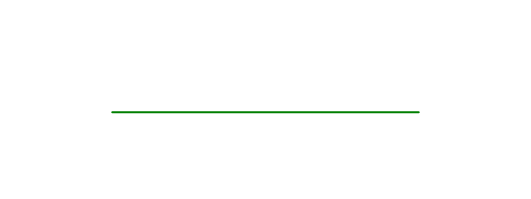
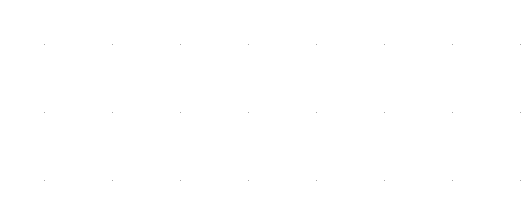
wire: (112, 112) (418, 112) -> none

